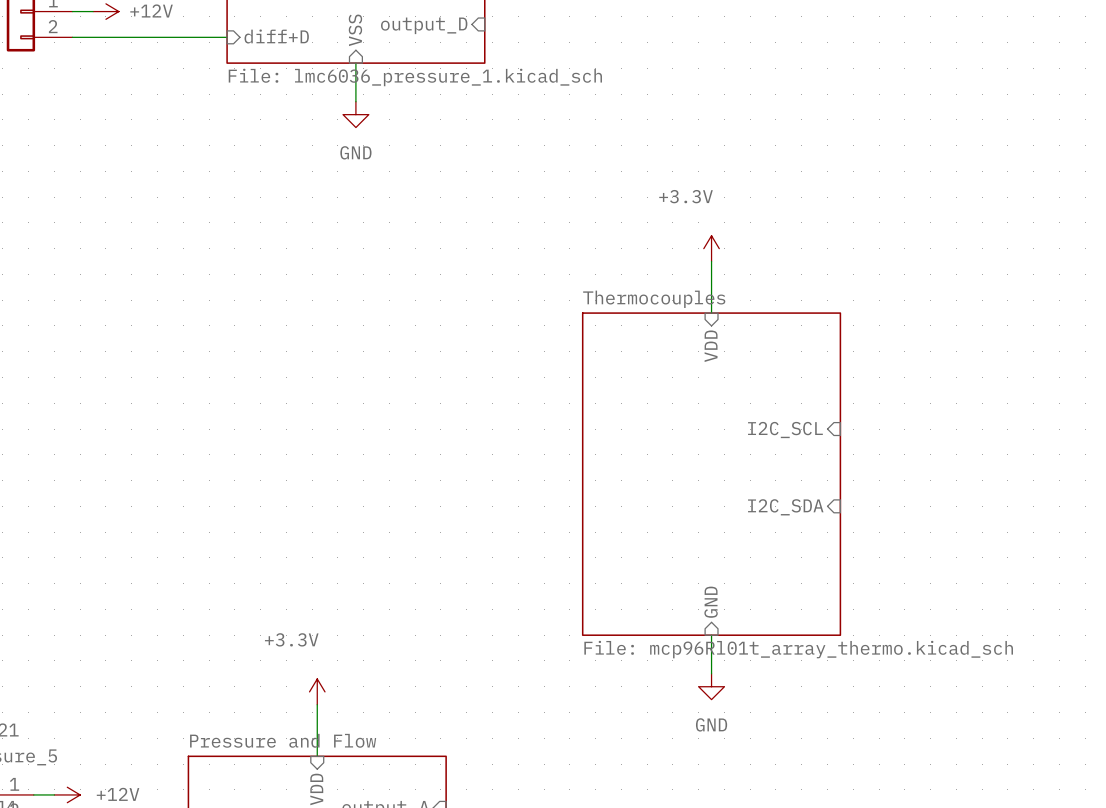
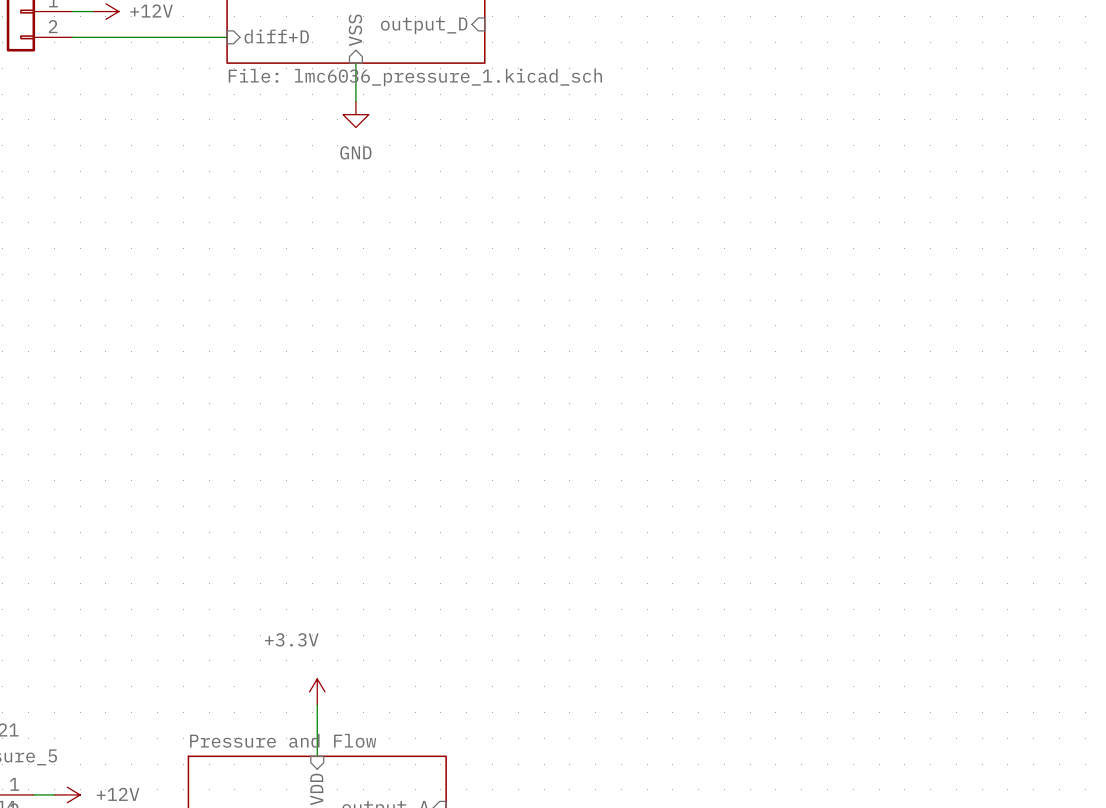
power symbol: +3.3V (711, 248) -> none
wire: (711, 261) (711, 313) -> none
sheet pin: VDD (711, 346) -> none
sheet pin: I2C_SCL (785, 430) -> none
sheet Thermocouples: File: mcp96Rl01t_array_thermo.kicad_sch (711, 474) -> none
sheet pin: I2C_SDA (785, 507) -> none
sheet pin: GND (711, 602) -> none
wire: (711, 635) (711, 673) -> none
power symbol: GND (711, 686) -> none

